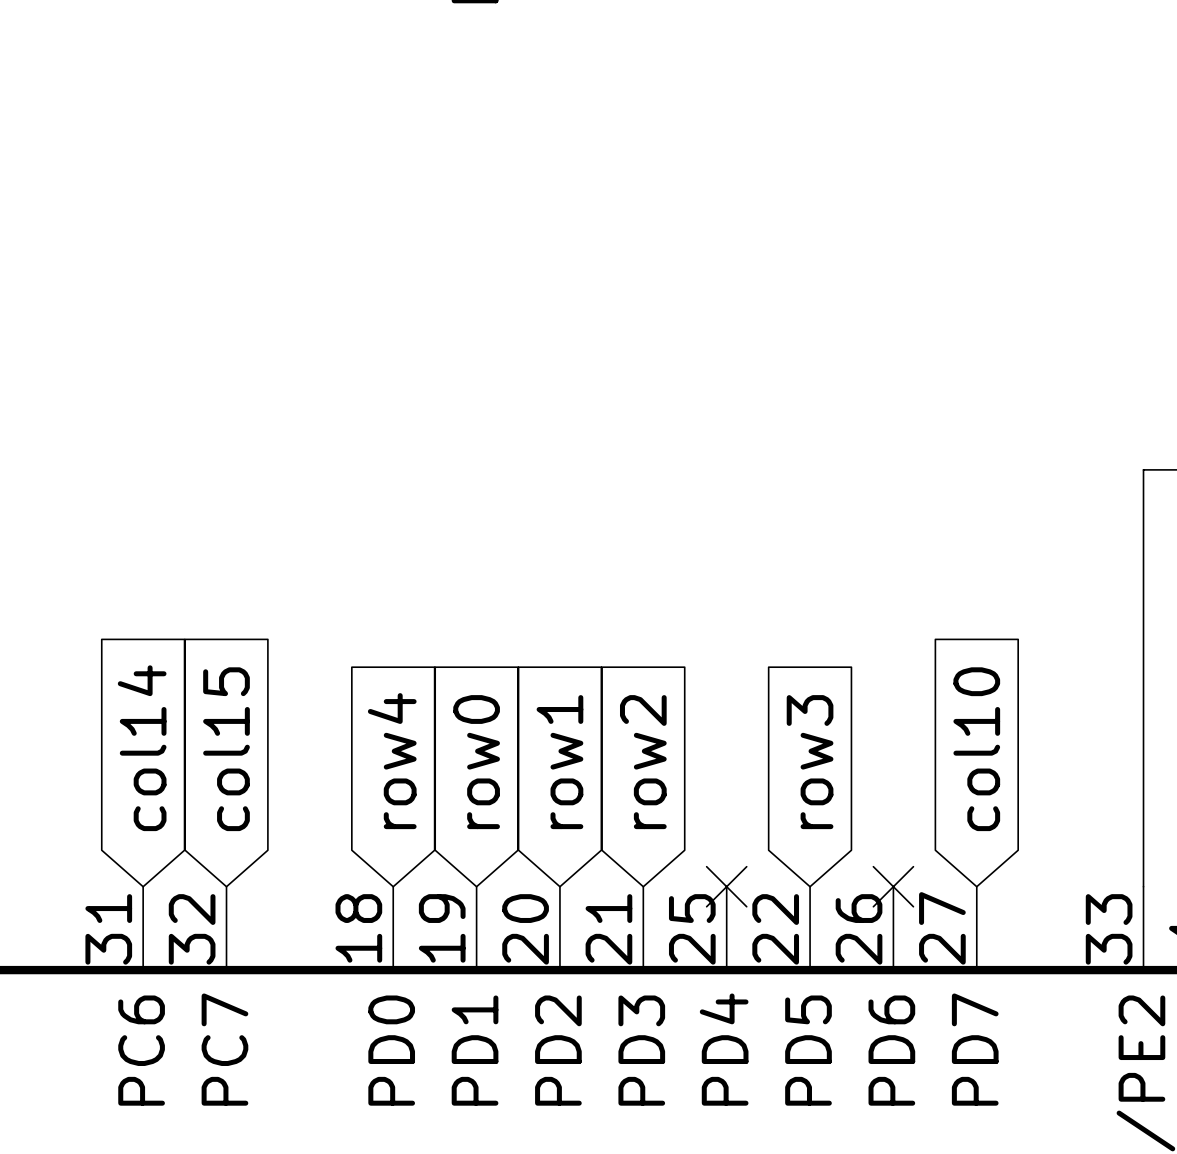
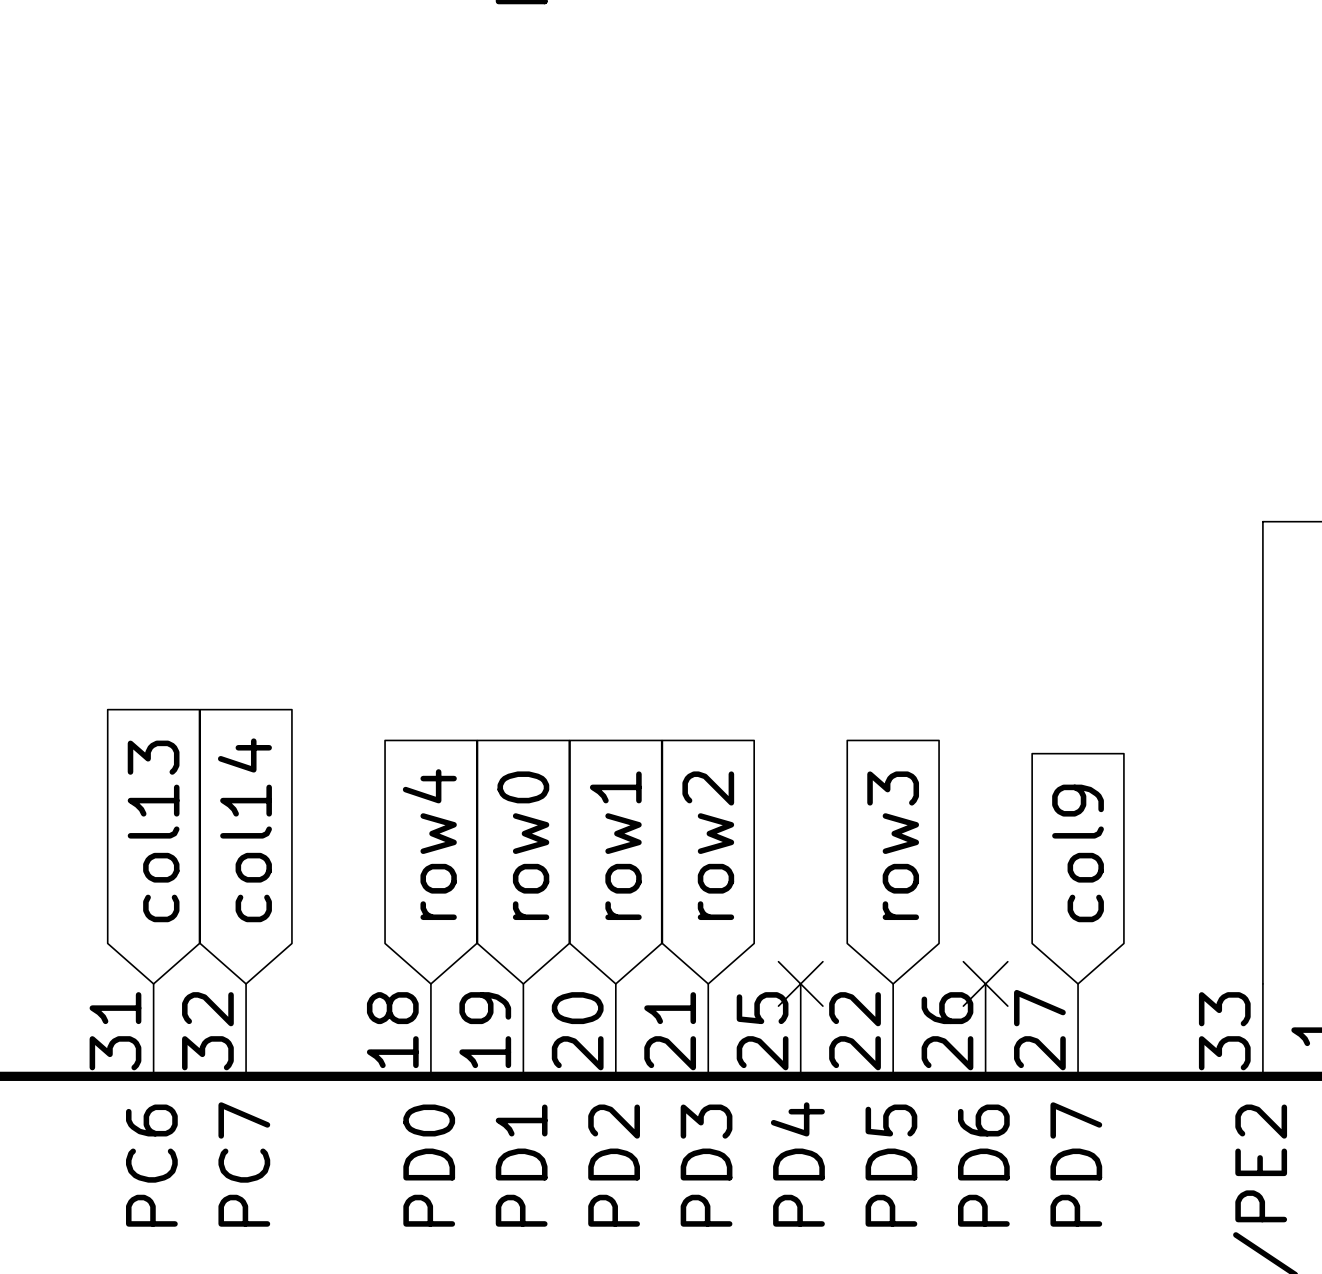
global label: col14 (142, 748) -> col13 (153, 831)
global label: col15 (226, 749) -> col14 (244, 830)
global label: col10 (976, 749) -> col9 (1078, 853)

